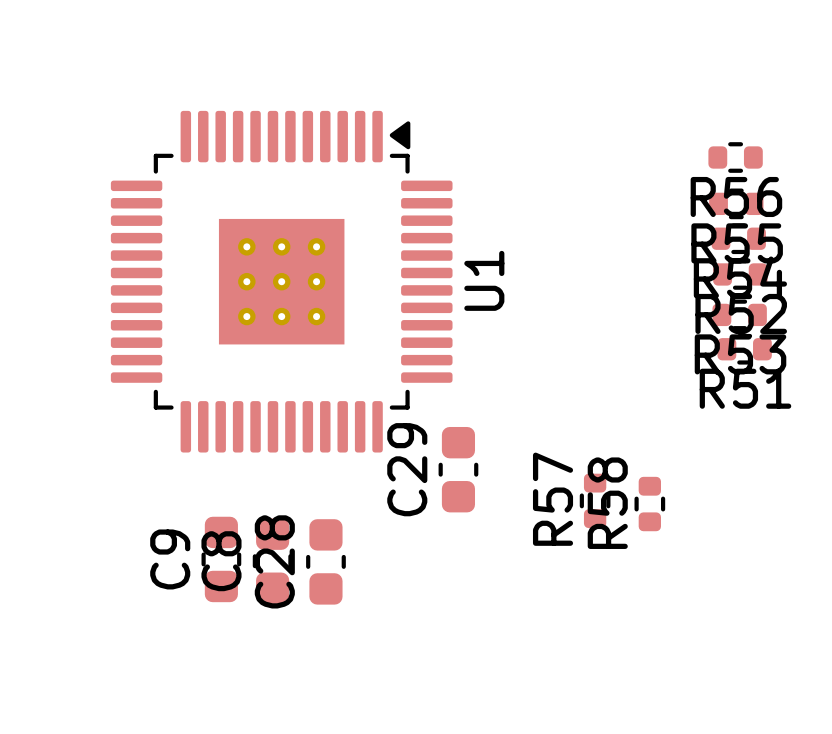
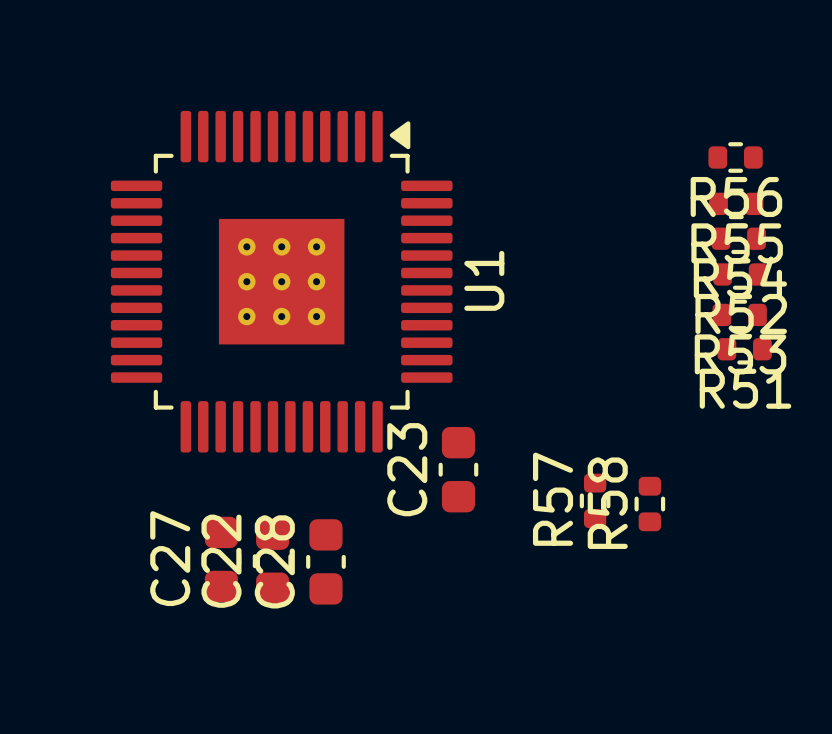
C29 name: C29 (407, 469) -> C23 (407, 469)
C9 name: C9 (170, 559) -> C27 (170, 558)
C8 name: C8 (221, 561) -> C22 (221, 561)

